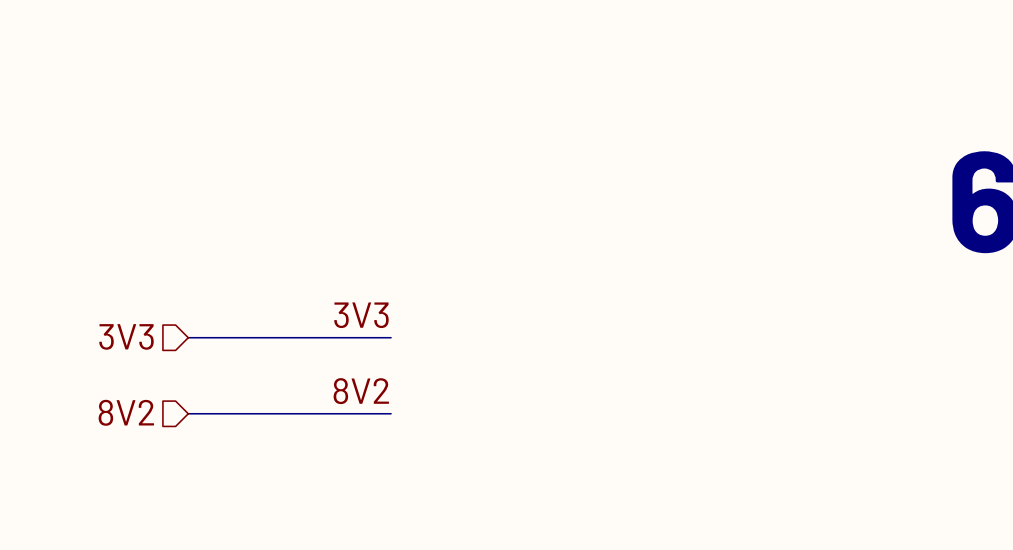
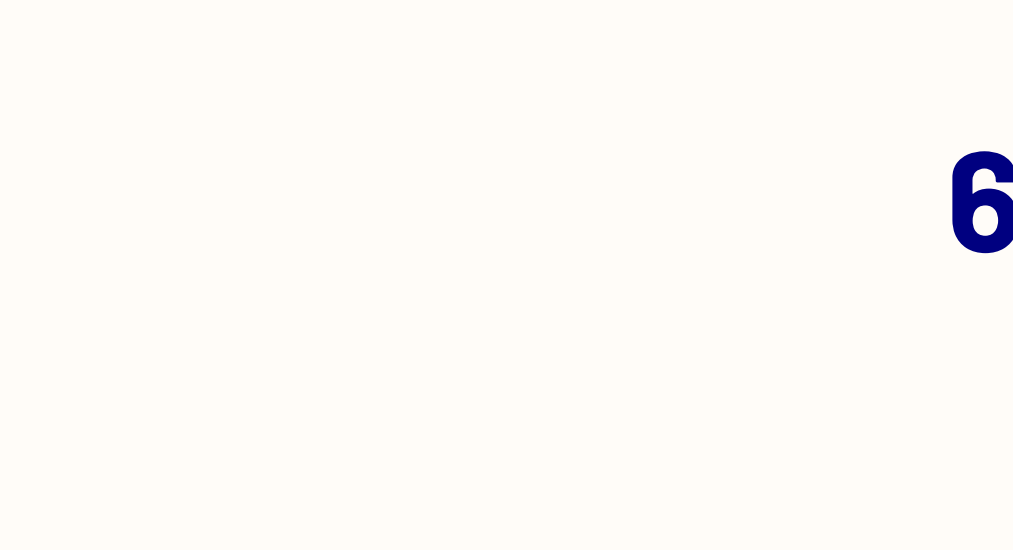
label: 3V3 (361, 315) -> none
hierarchical label: 3V3 (126, 336) -> none
wire: (188, 337) (391, 337) -> none
label: 8V2 (361, 391) -> none
hierarchical label: 8V2 (126, 412) -> none
wire: (188, 413) (391, 413) -> none

